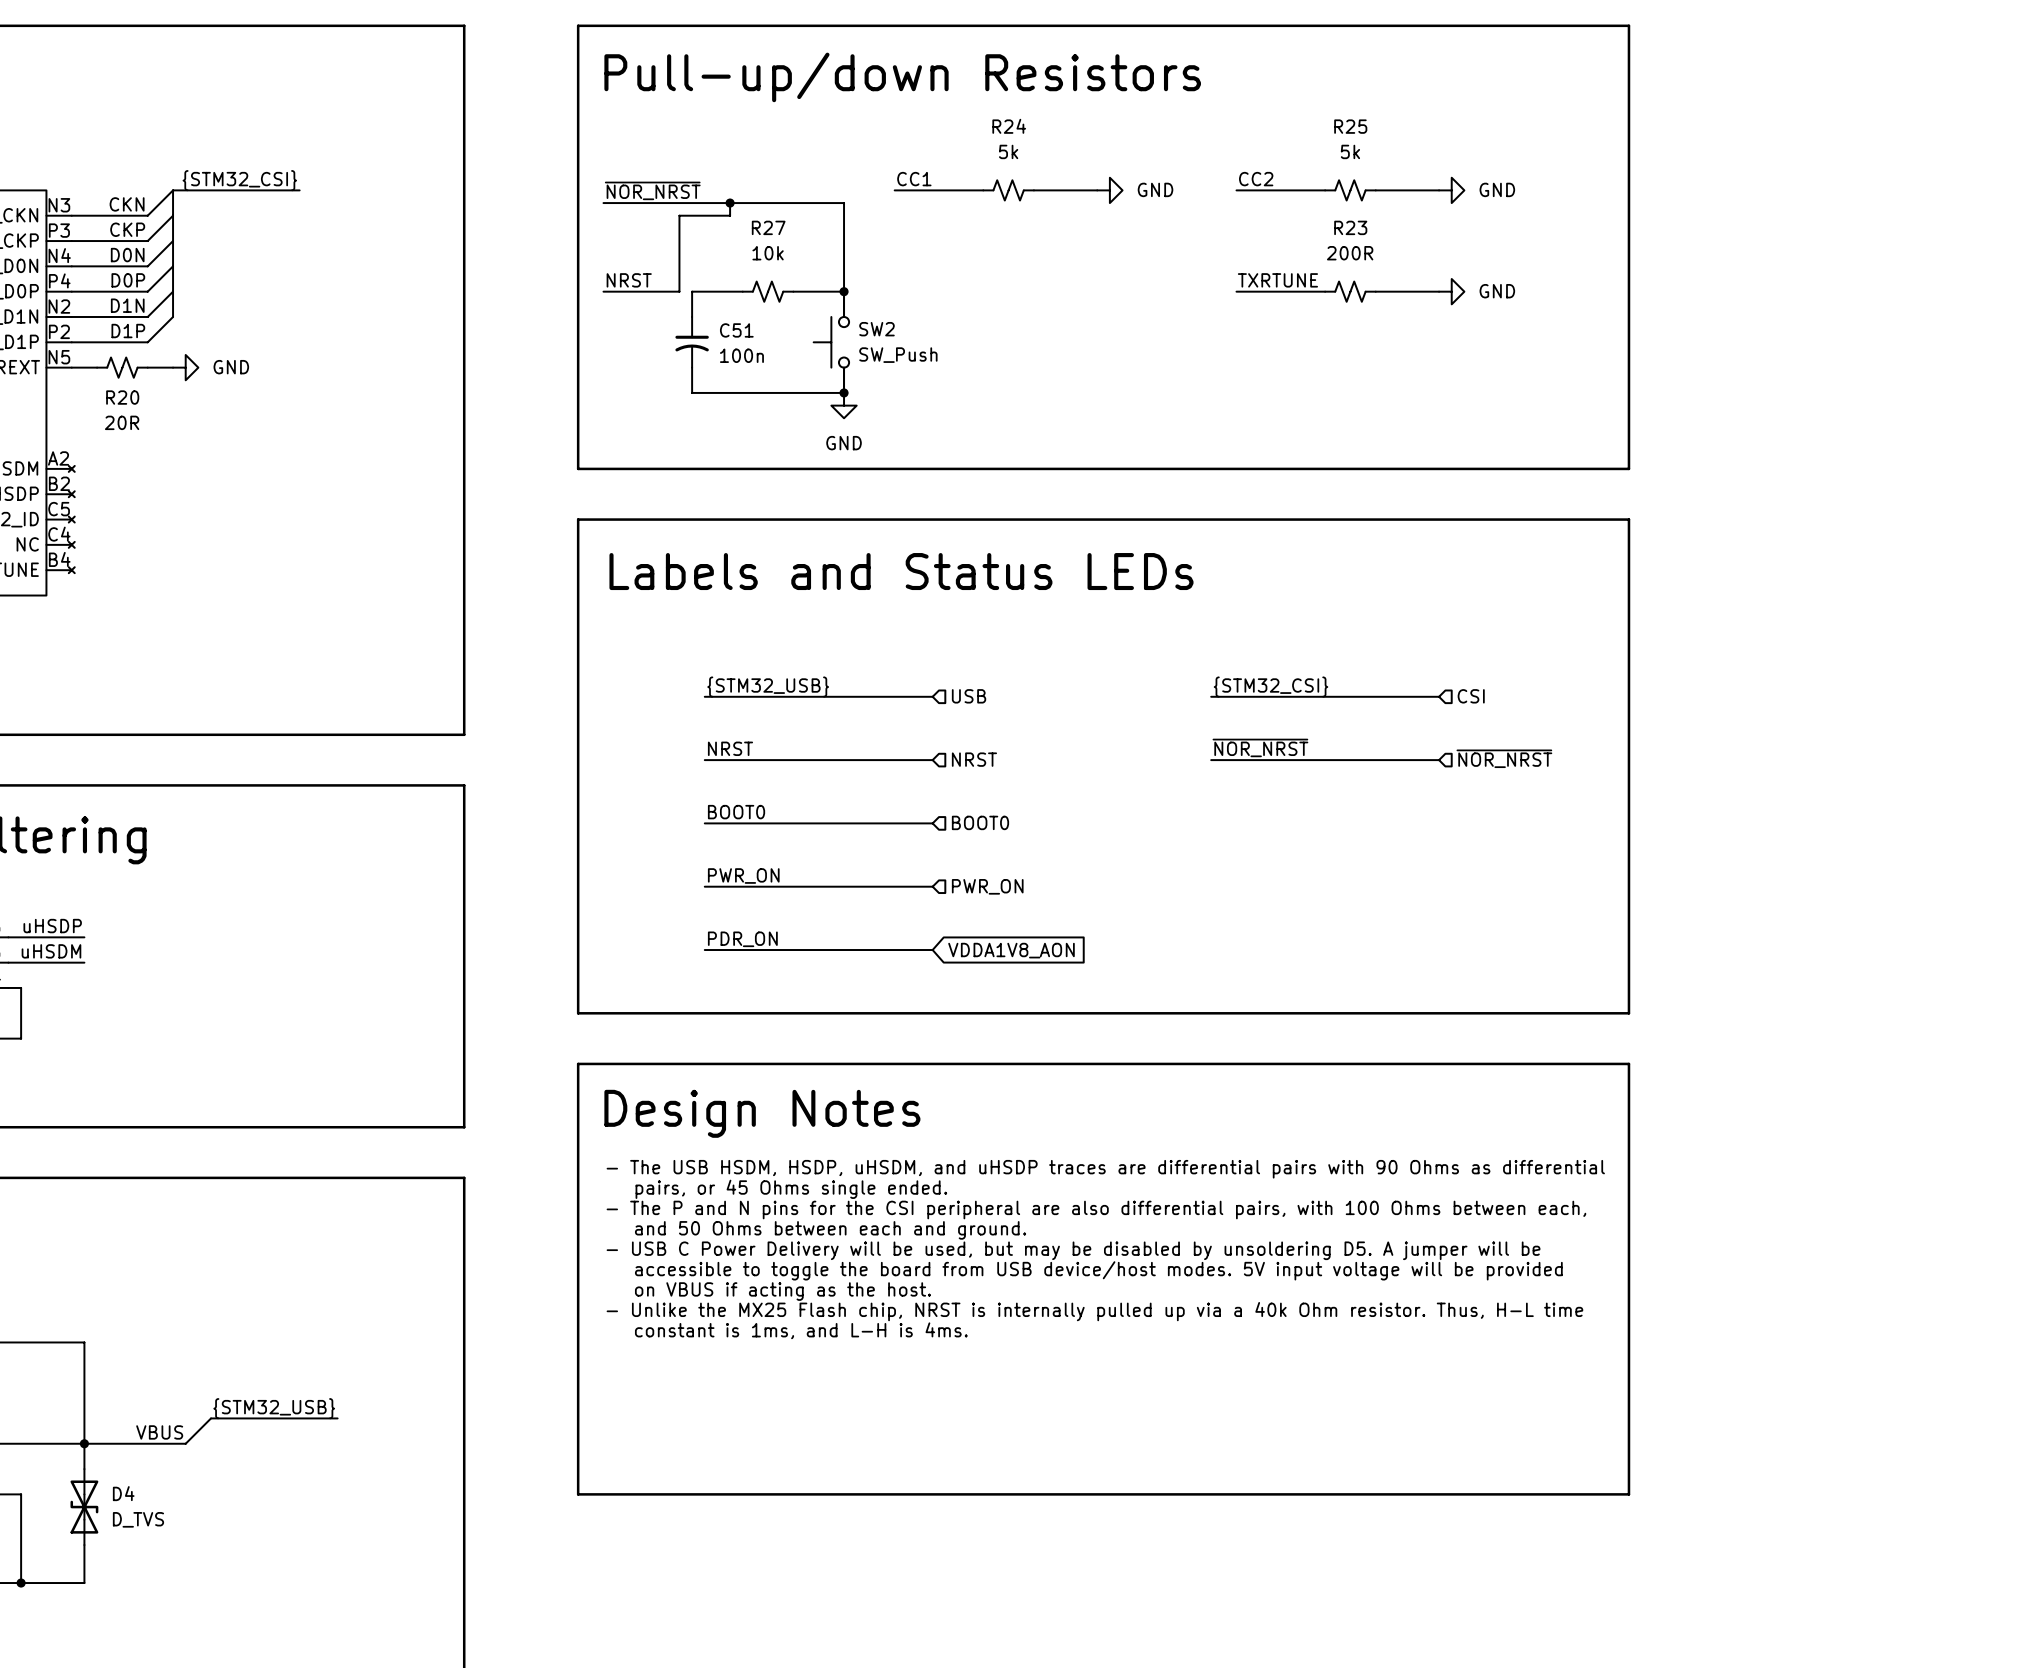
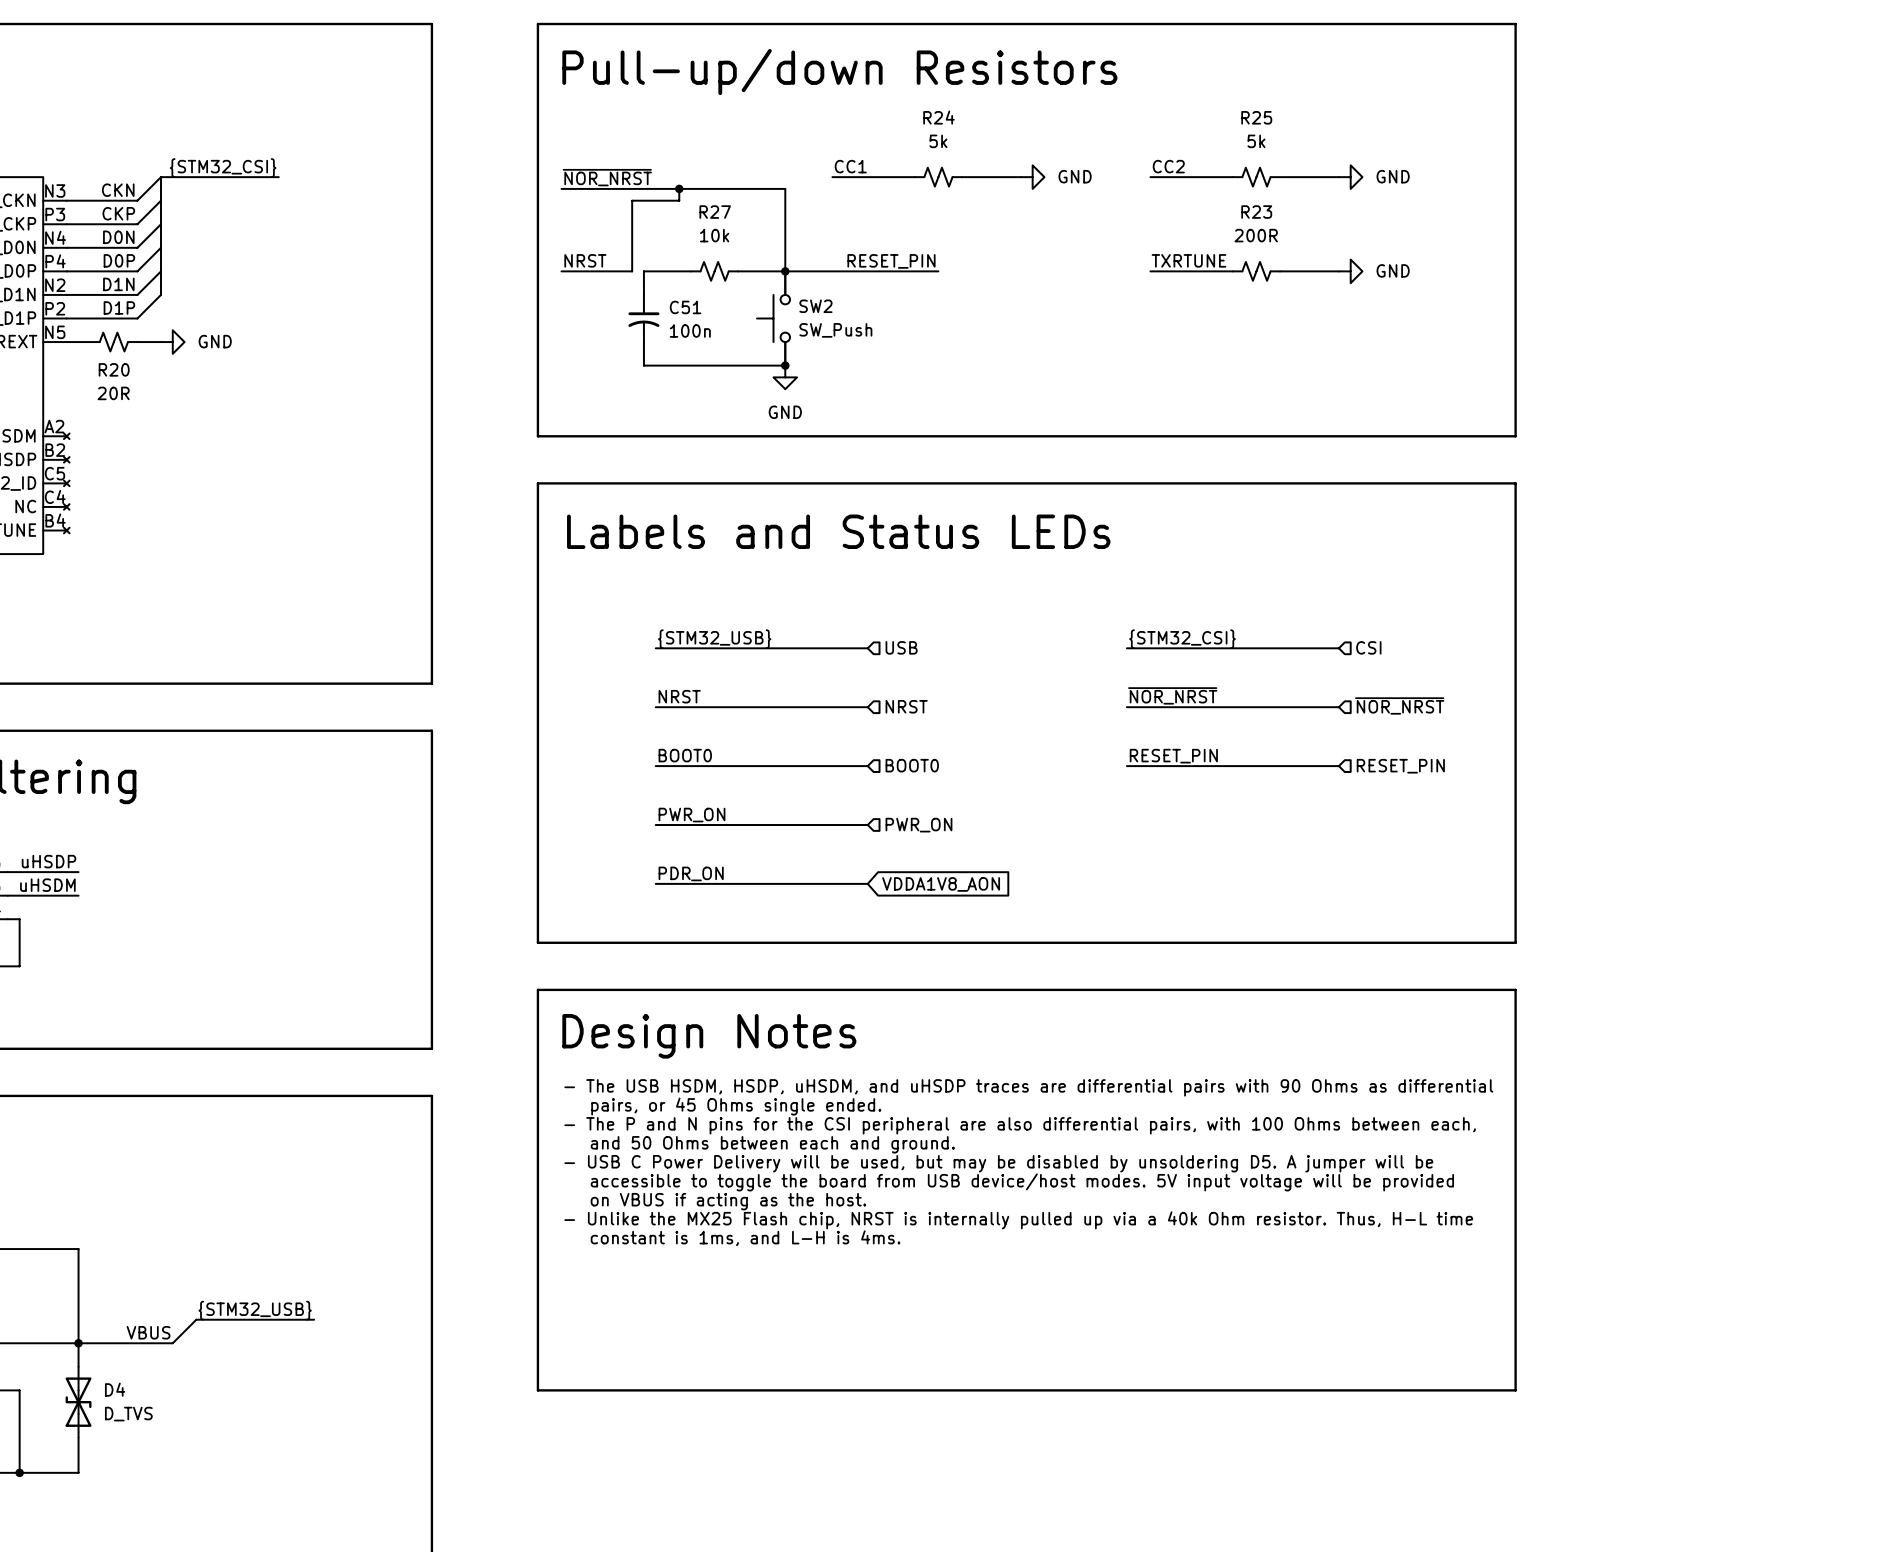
label: none -> RESET_PIN (891, 261)
wire: none -> (785, 271) (938, 271)
label: none -> RESET_PIN (1173, 756)
wire: none -> (1126, 766) (1338, 766)
hierarchical label: none -> RESET_PIN (1400, 766)

